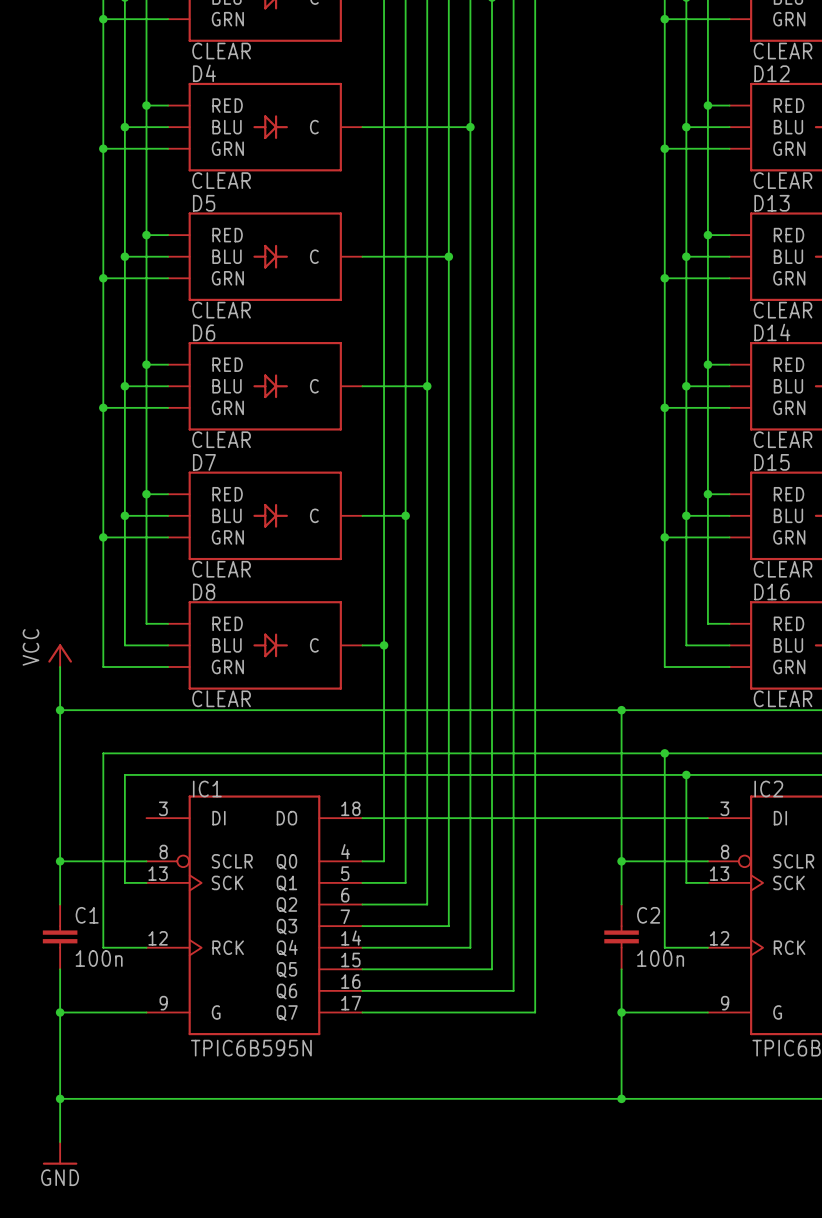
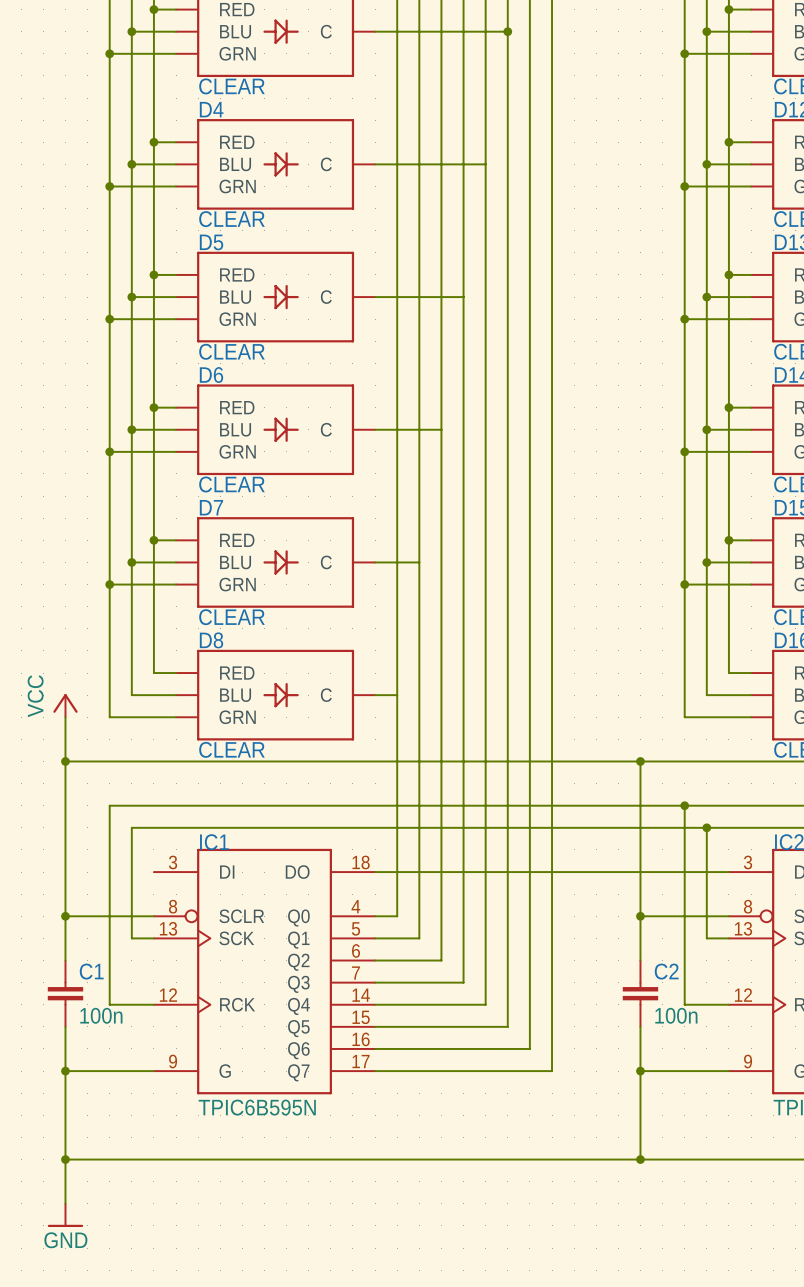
junction: (470, 127) -> none
junction: (448, 256) -> none
junction: (427, 386) -> none
junction: (405, 515) -> none
junction: (384, 645) -> none

